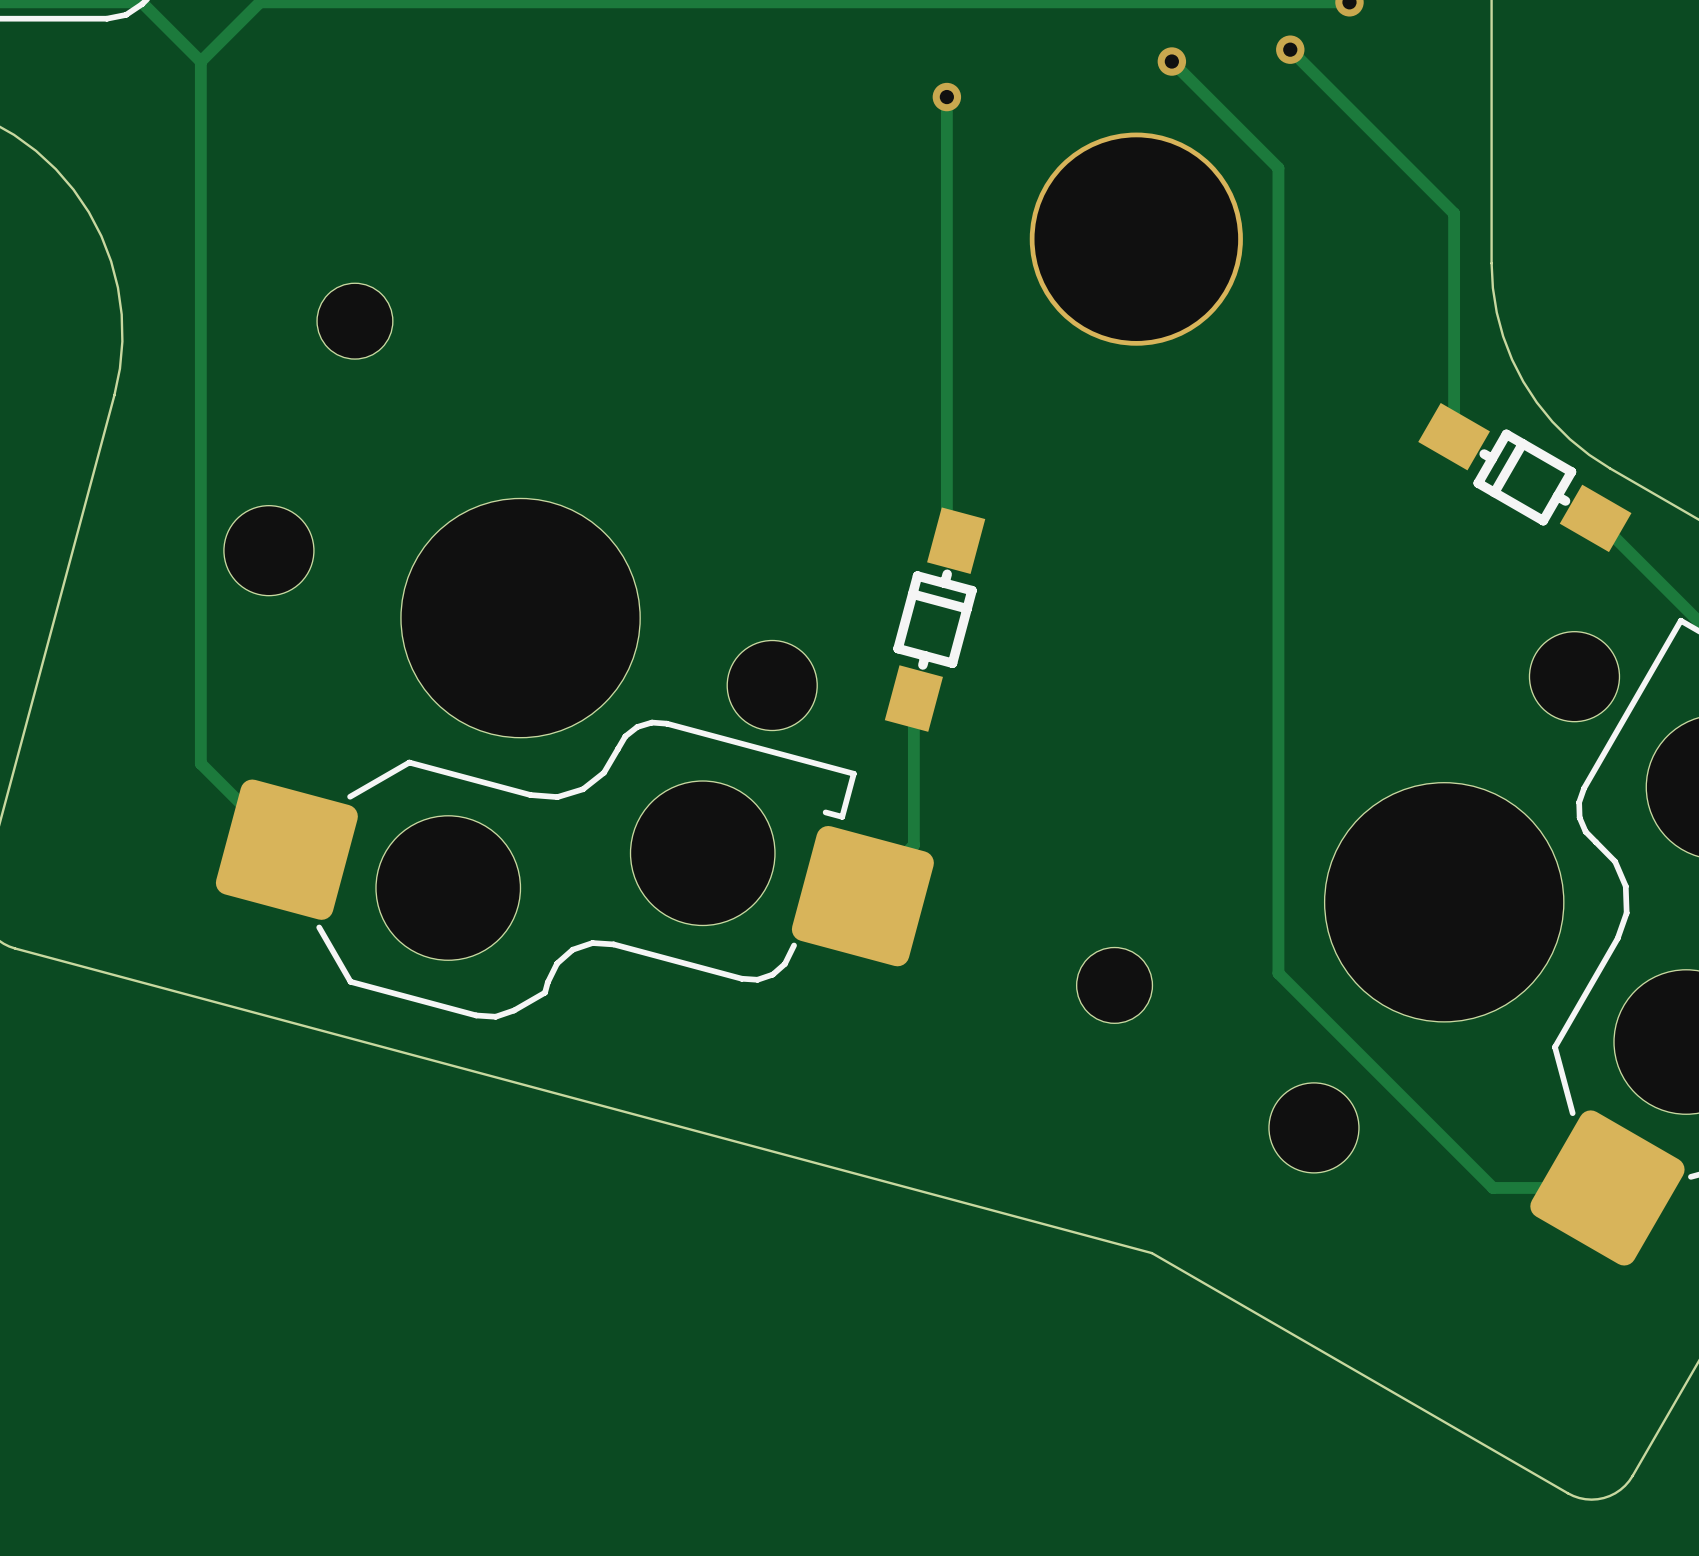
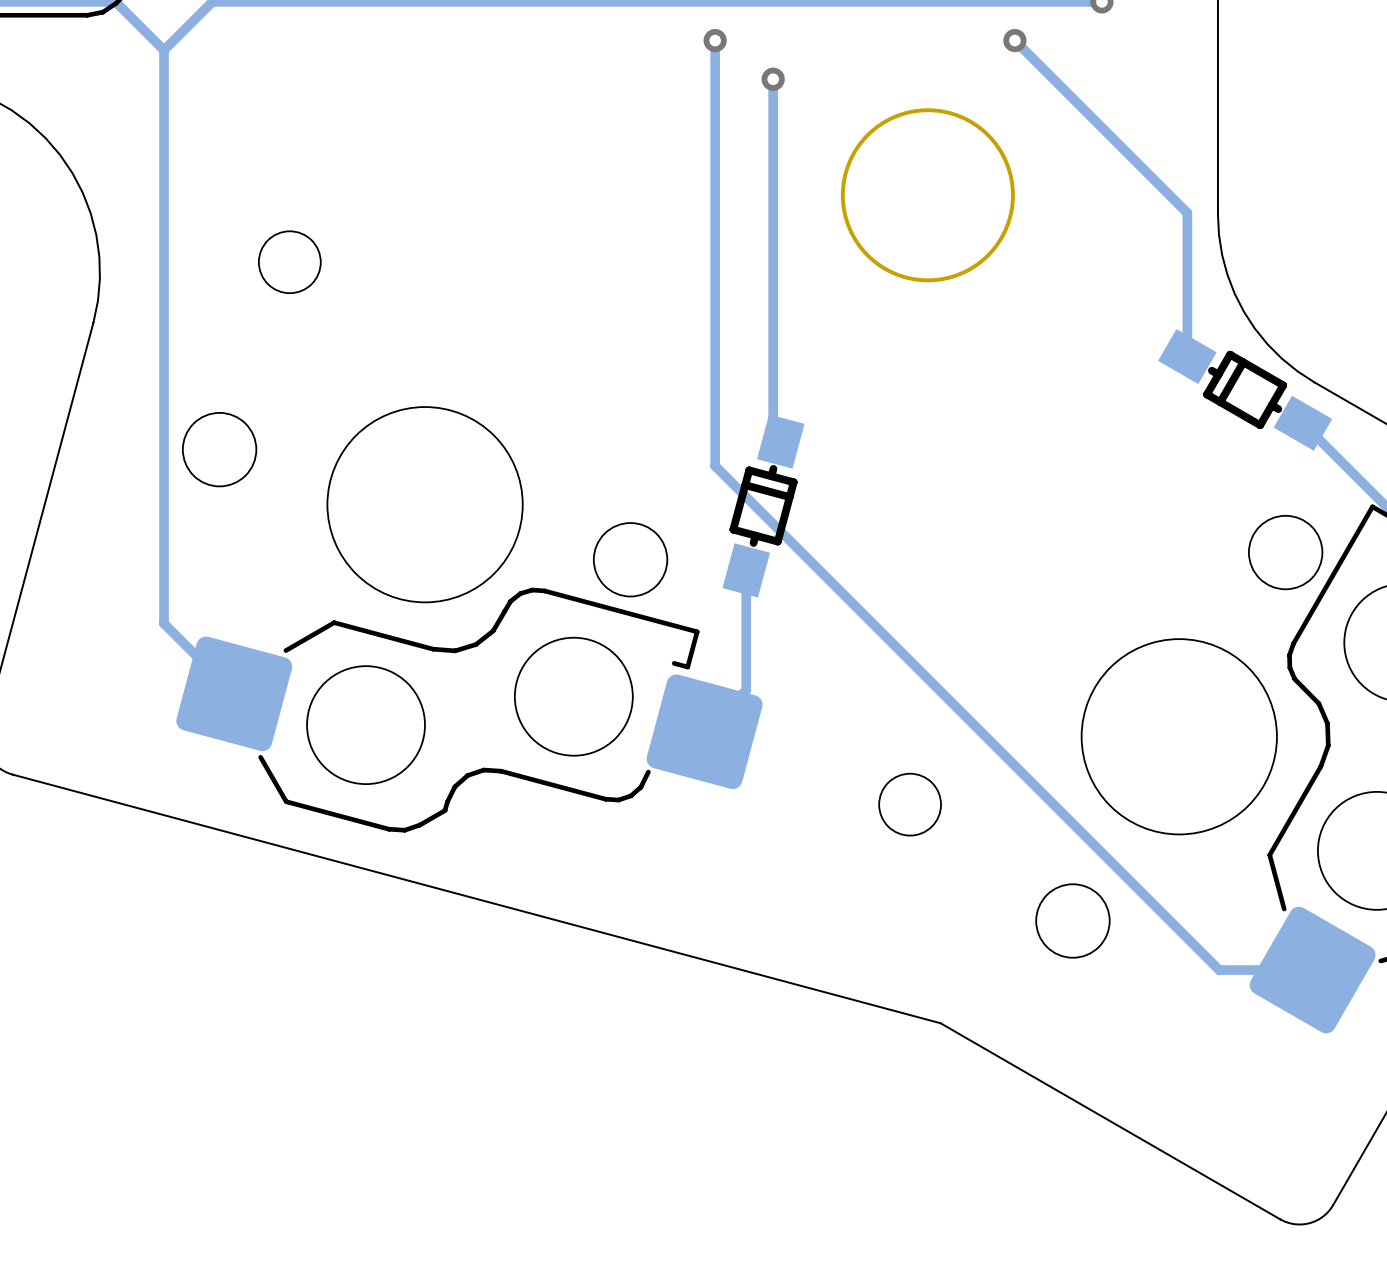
via: none -> (715, 40)
via: none -> (1014, 40)
track: (1290, 49) (1454, 213) (1454, 260) -> (1014, 40) (1187, 213)
via: (1290, 49) -> none
track: (1171, 61) (1278, 168) (1278, 973) -> (715, 40) (715, 466) (1043, 794)
via: (1171, 61) -> none

